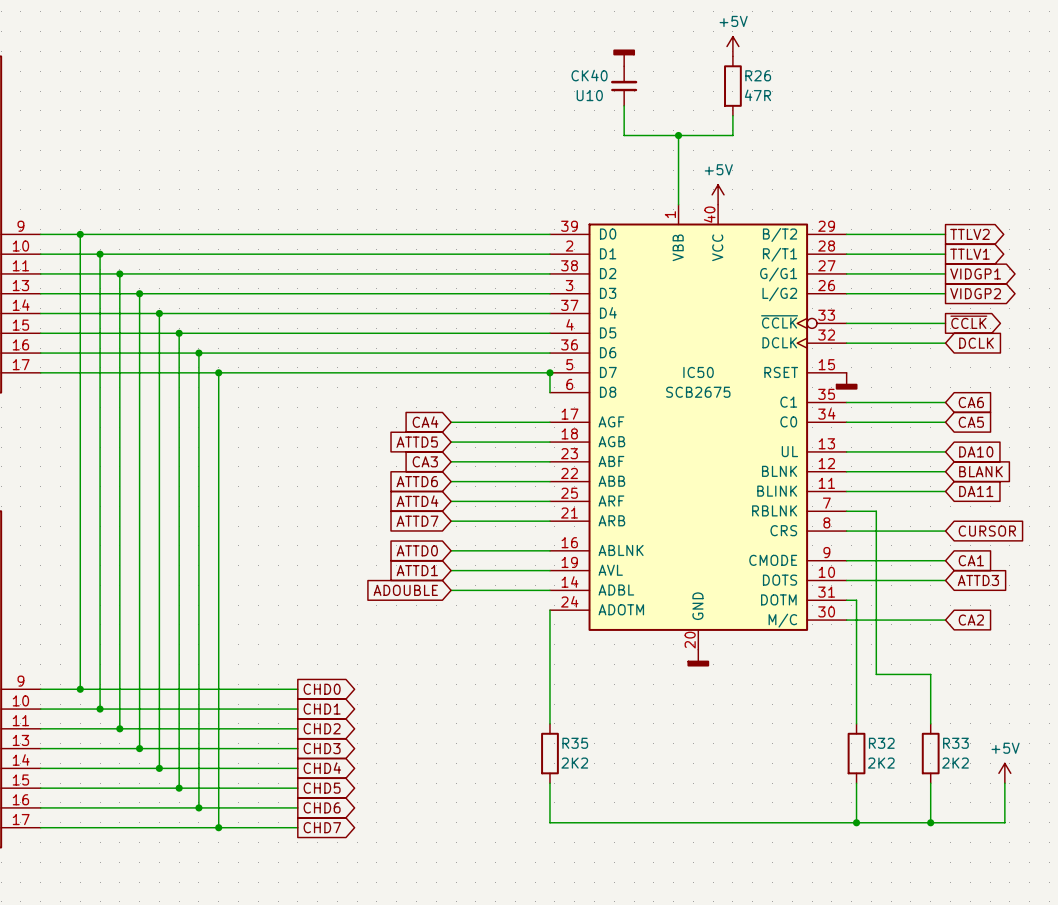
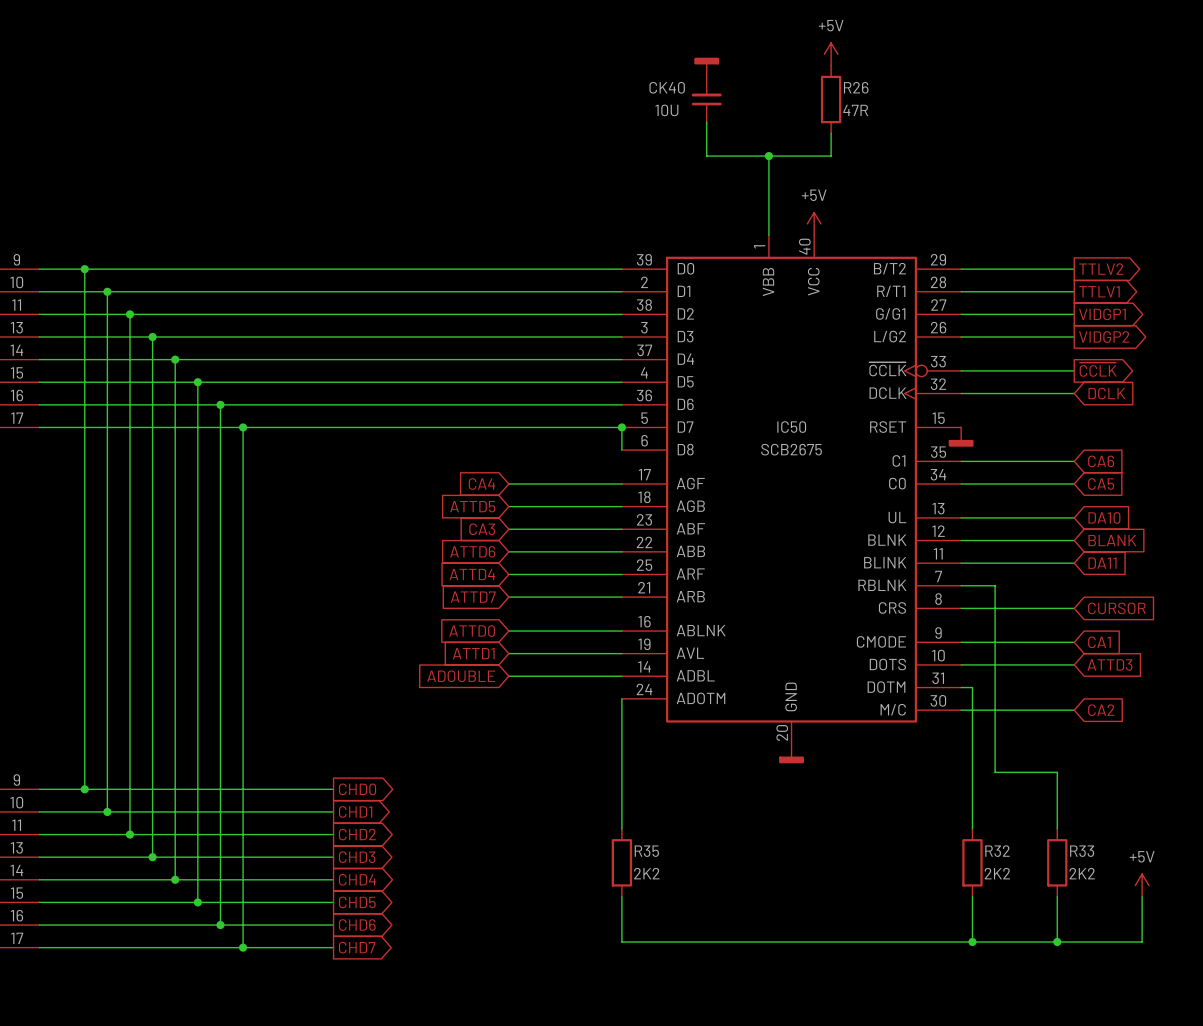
CK40 value: U10 (589, 95) -> 10U (666, 110)

